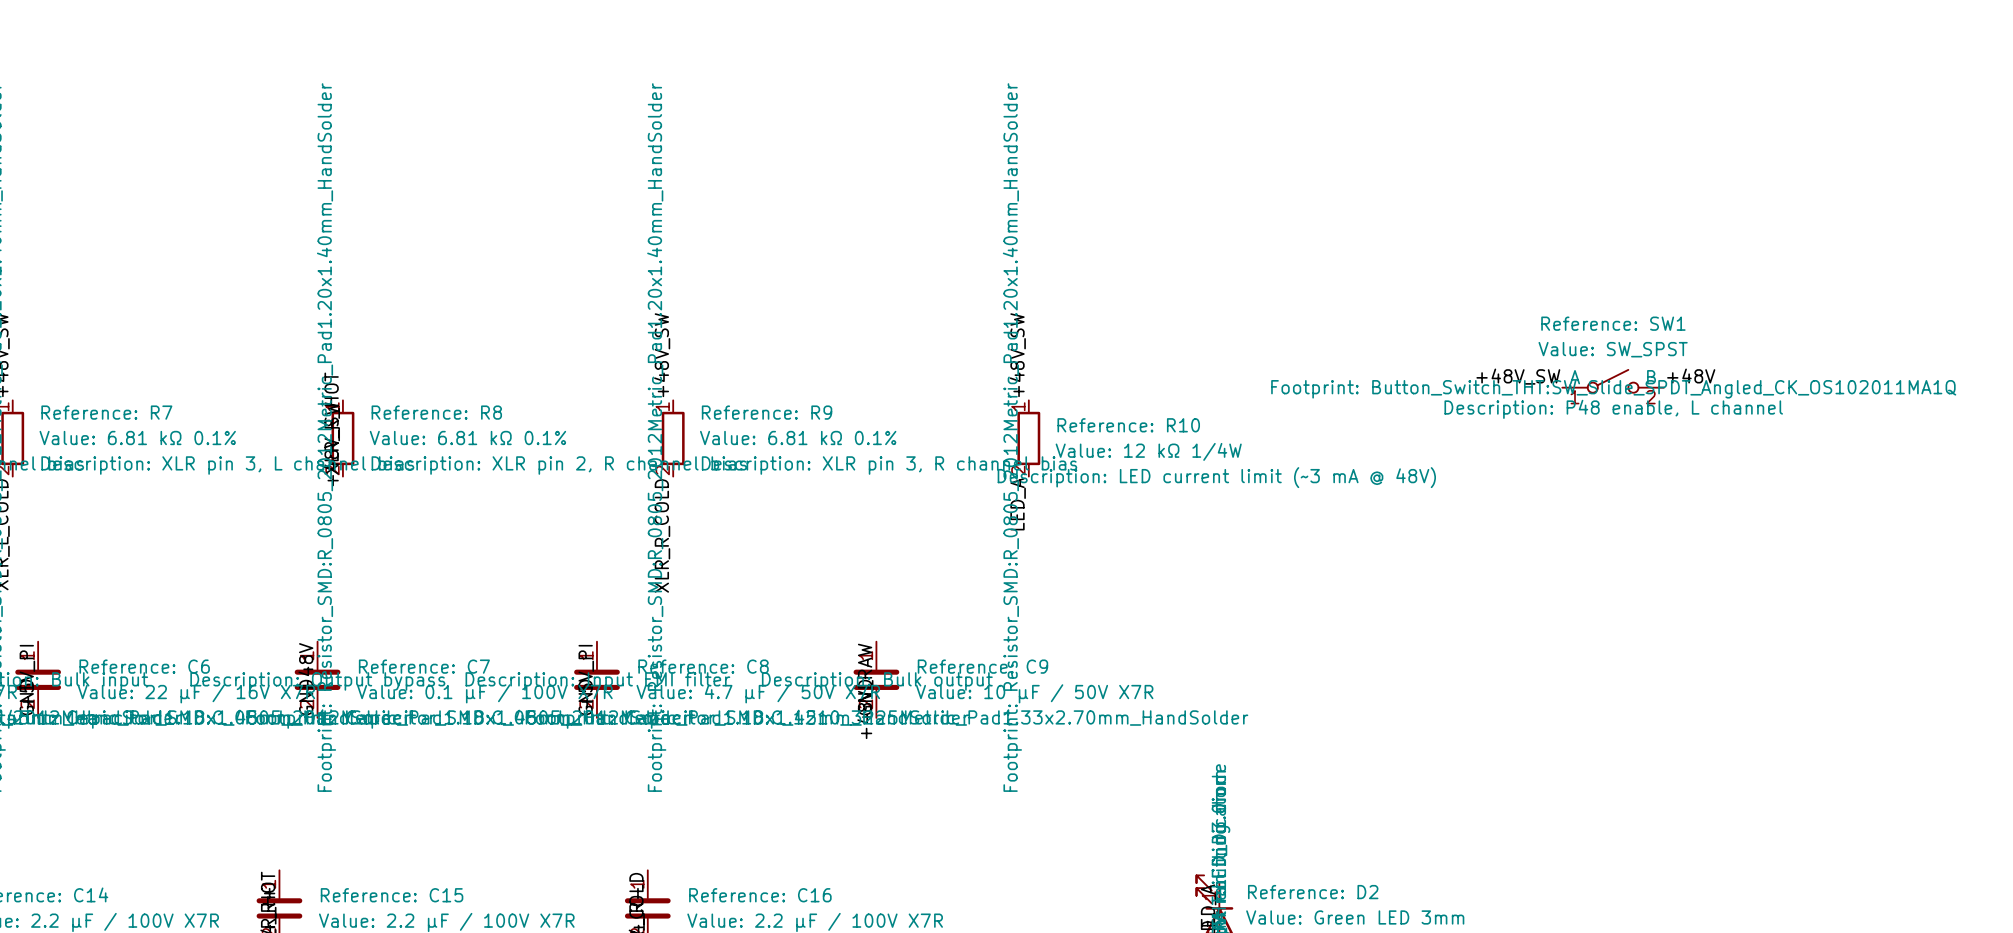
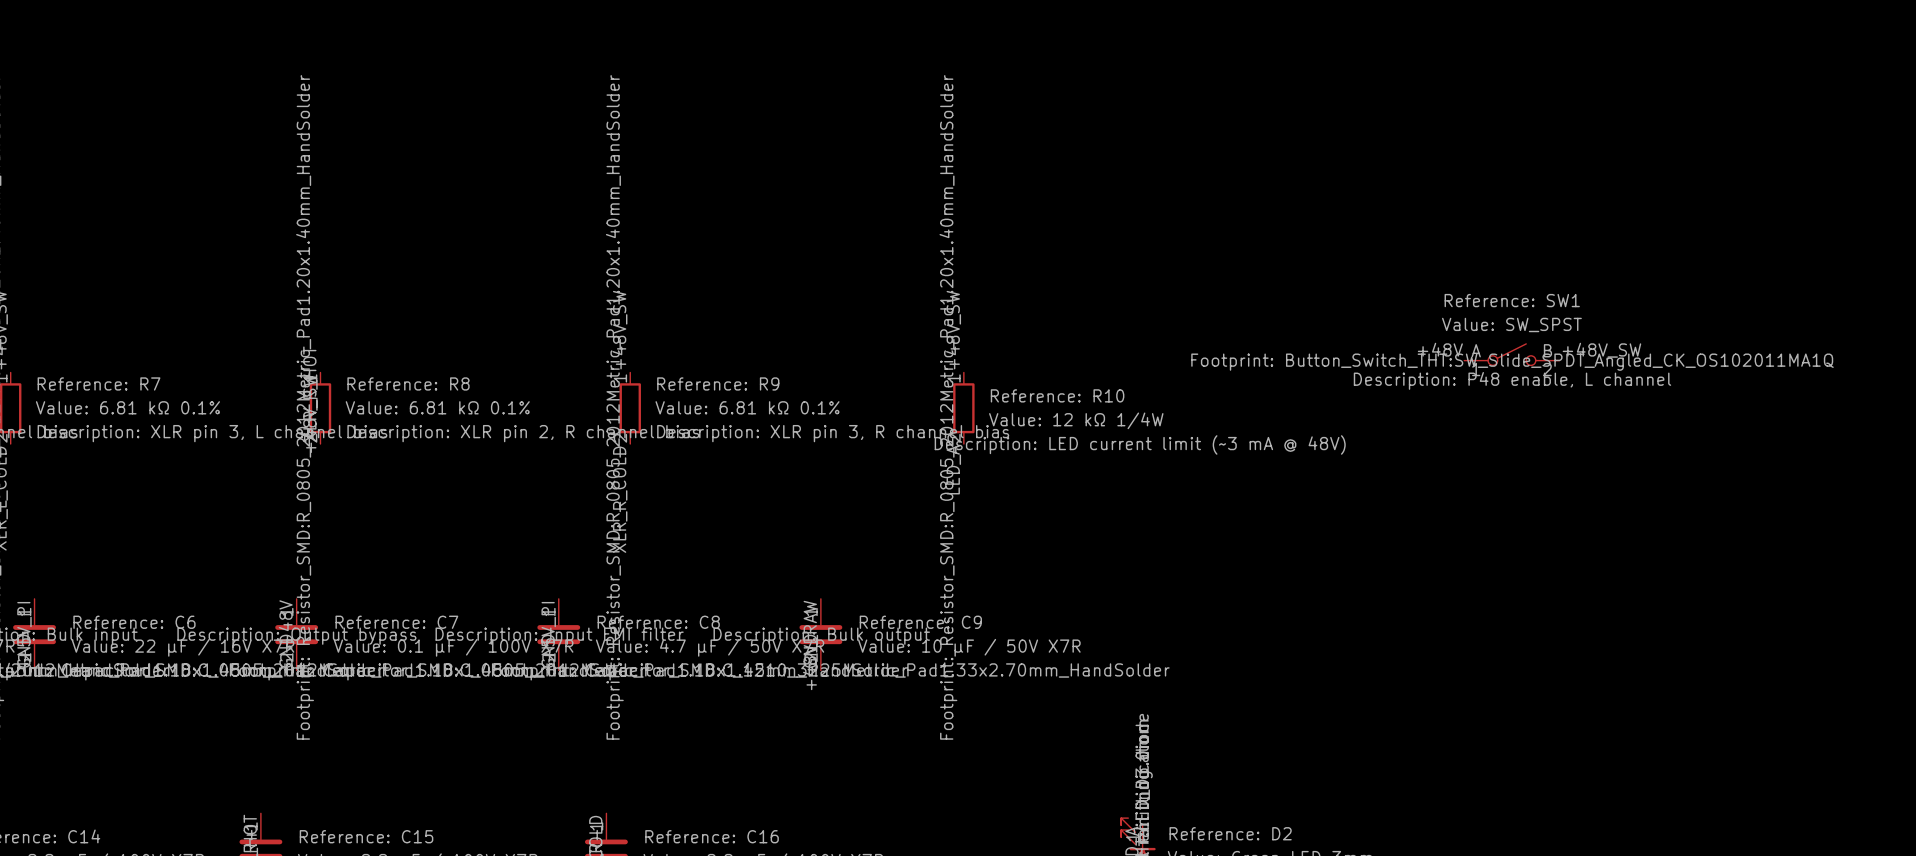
label: +48V_SW (1518, 376) -> +48V (1440, 349)
label: +48V (1691, 376) -> +48V_SW (1601, 350)

